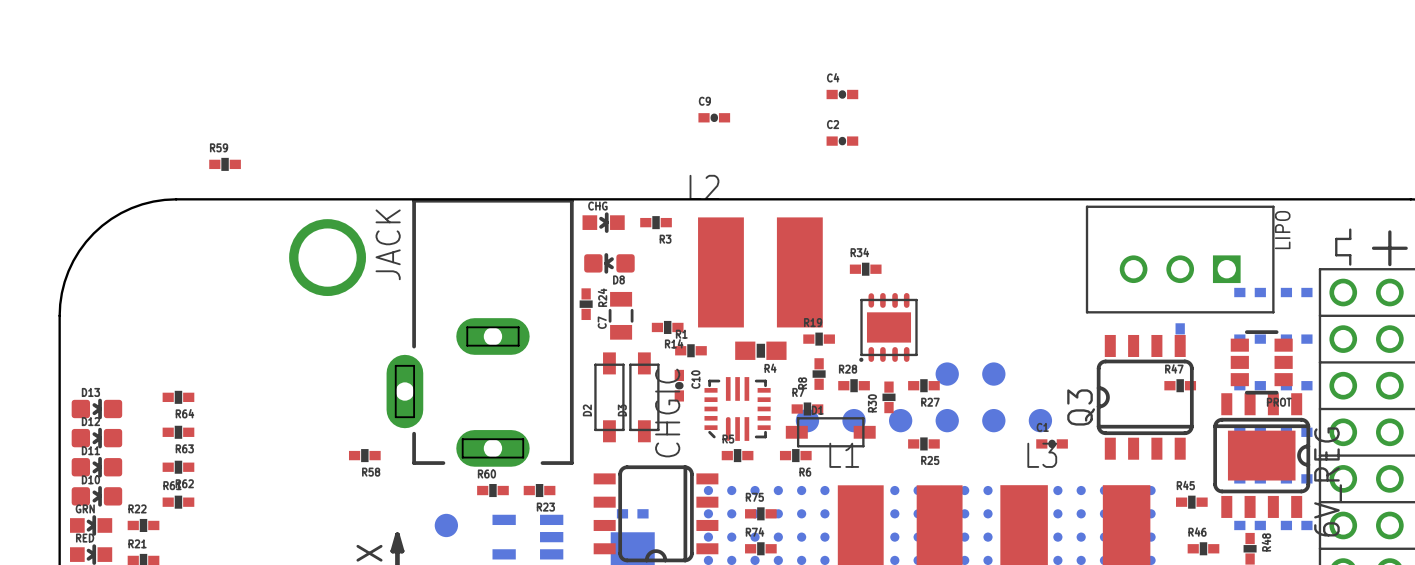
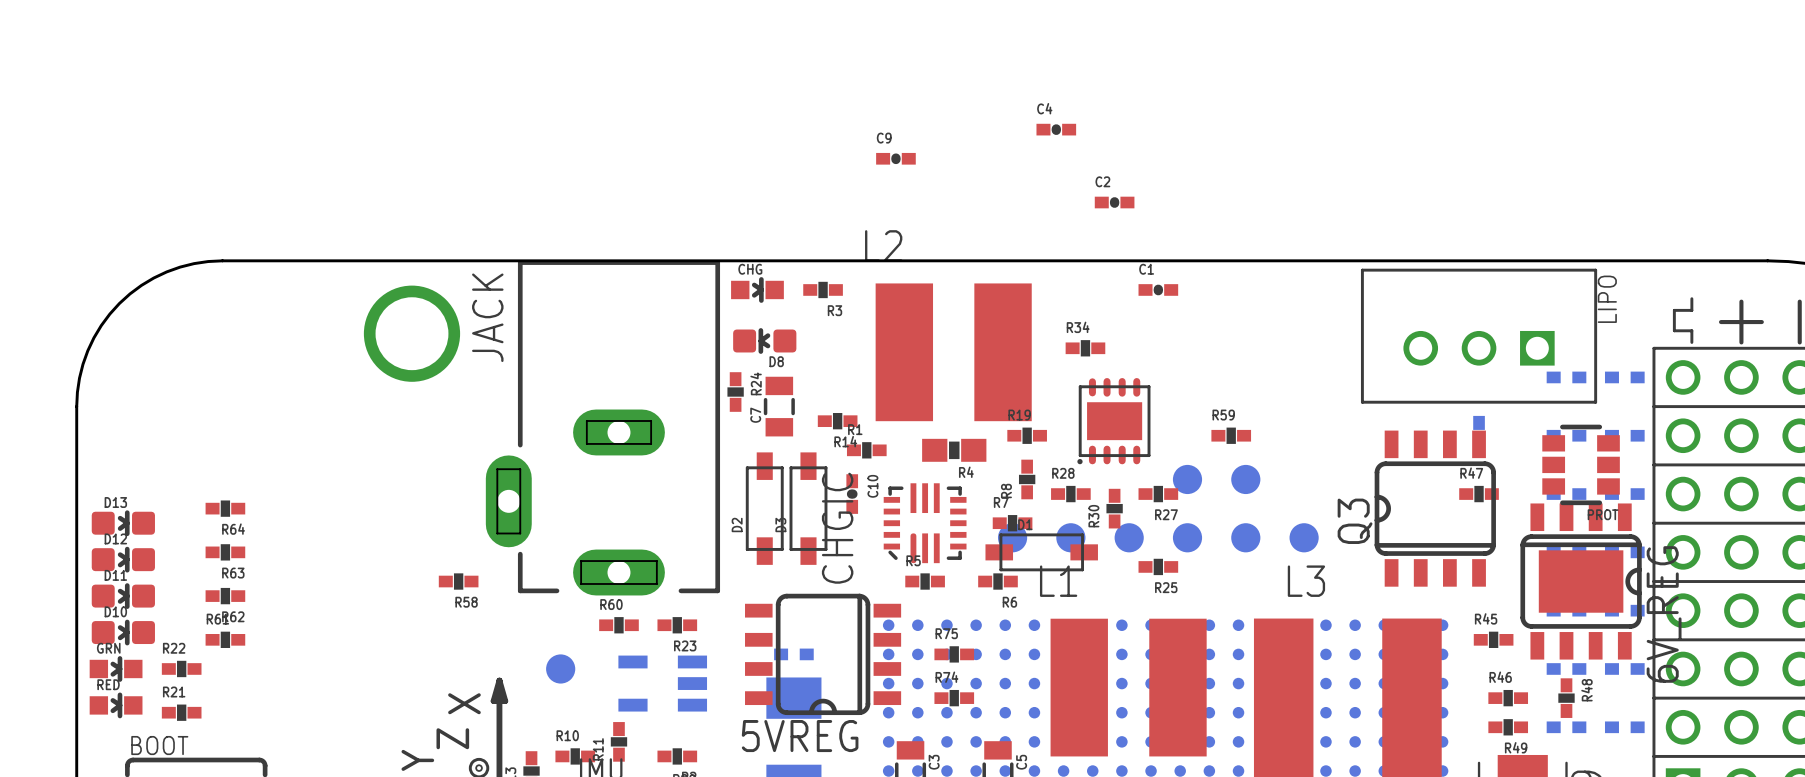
C2 position: (842, 141) -> (1114, 202)
R59 position: (225, 164) -> (1231, 435)
C1 position: (1052, 443) -> (1158, 289)

